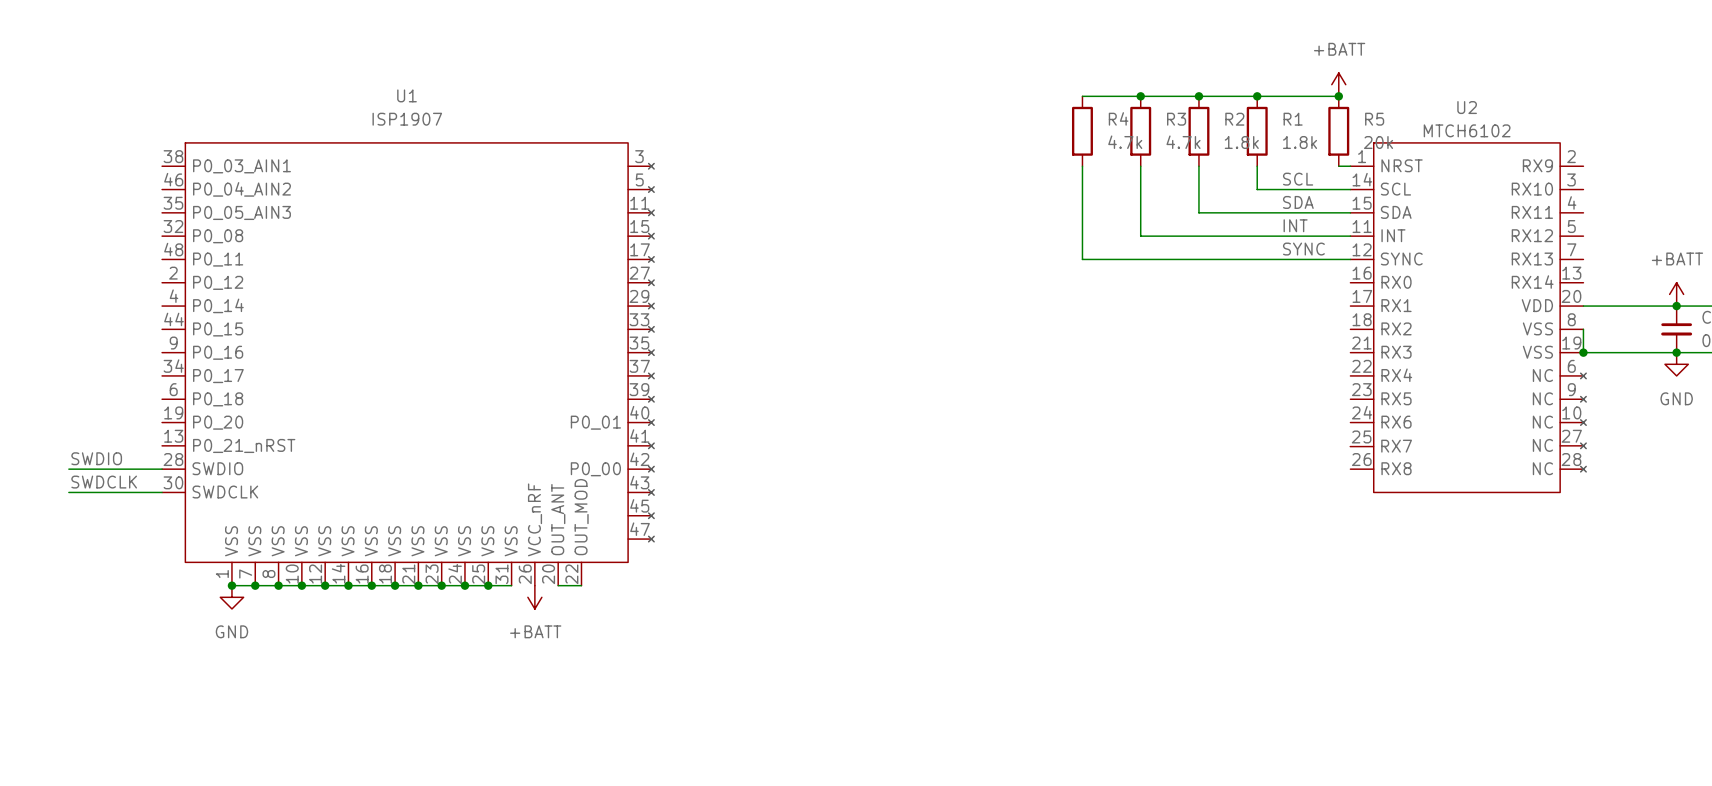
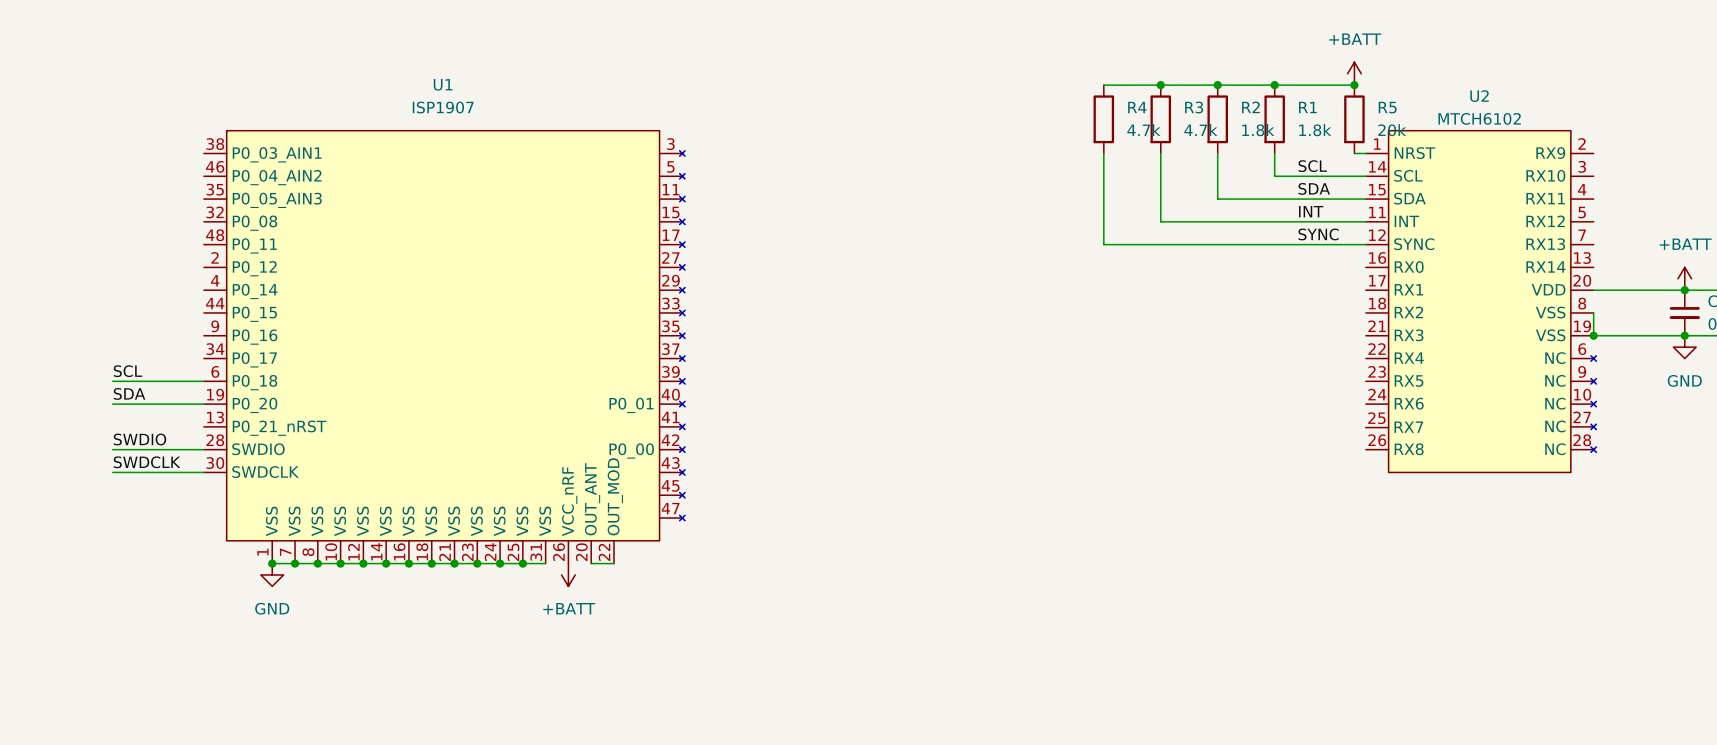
label: none -> SCL (128, 371)
wire: none -> (112, 381) (203, 381)
label: none -> SDA (129, 393)
wire: none -> (112, 404) (203, 404)

